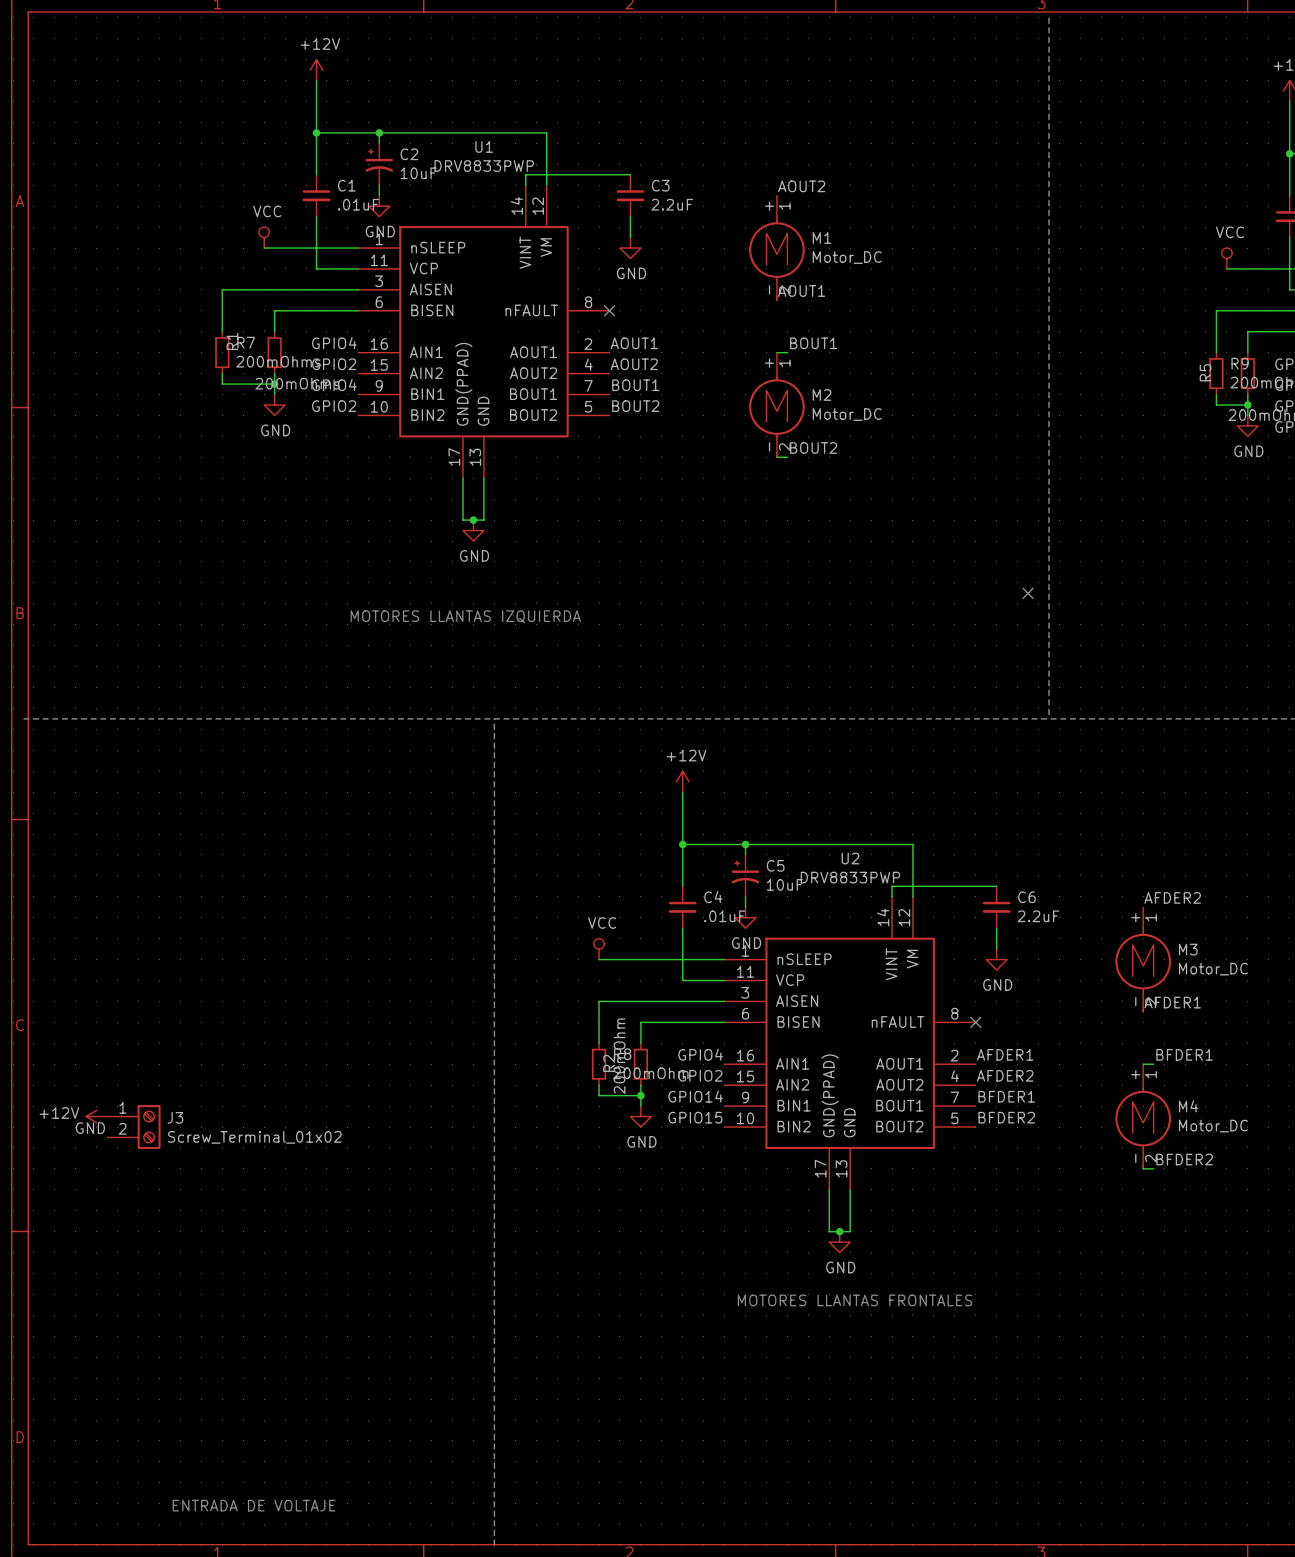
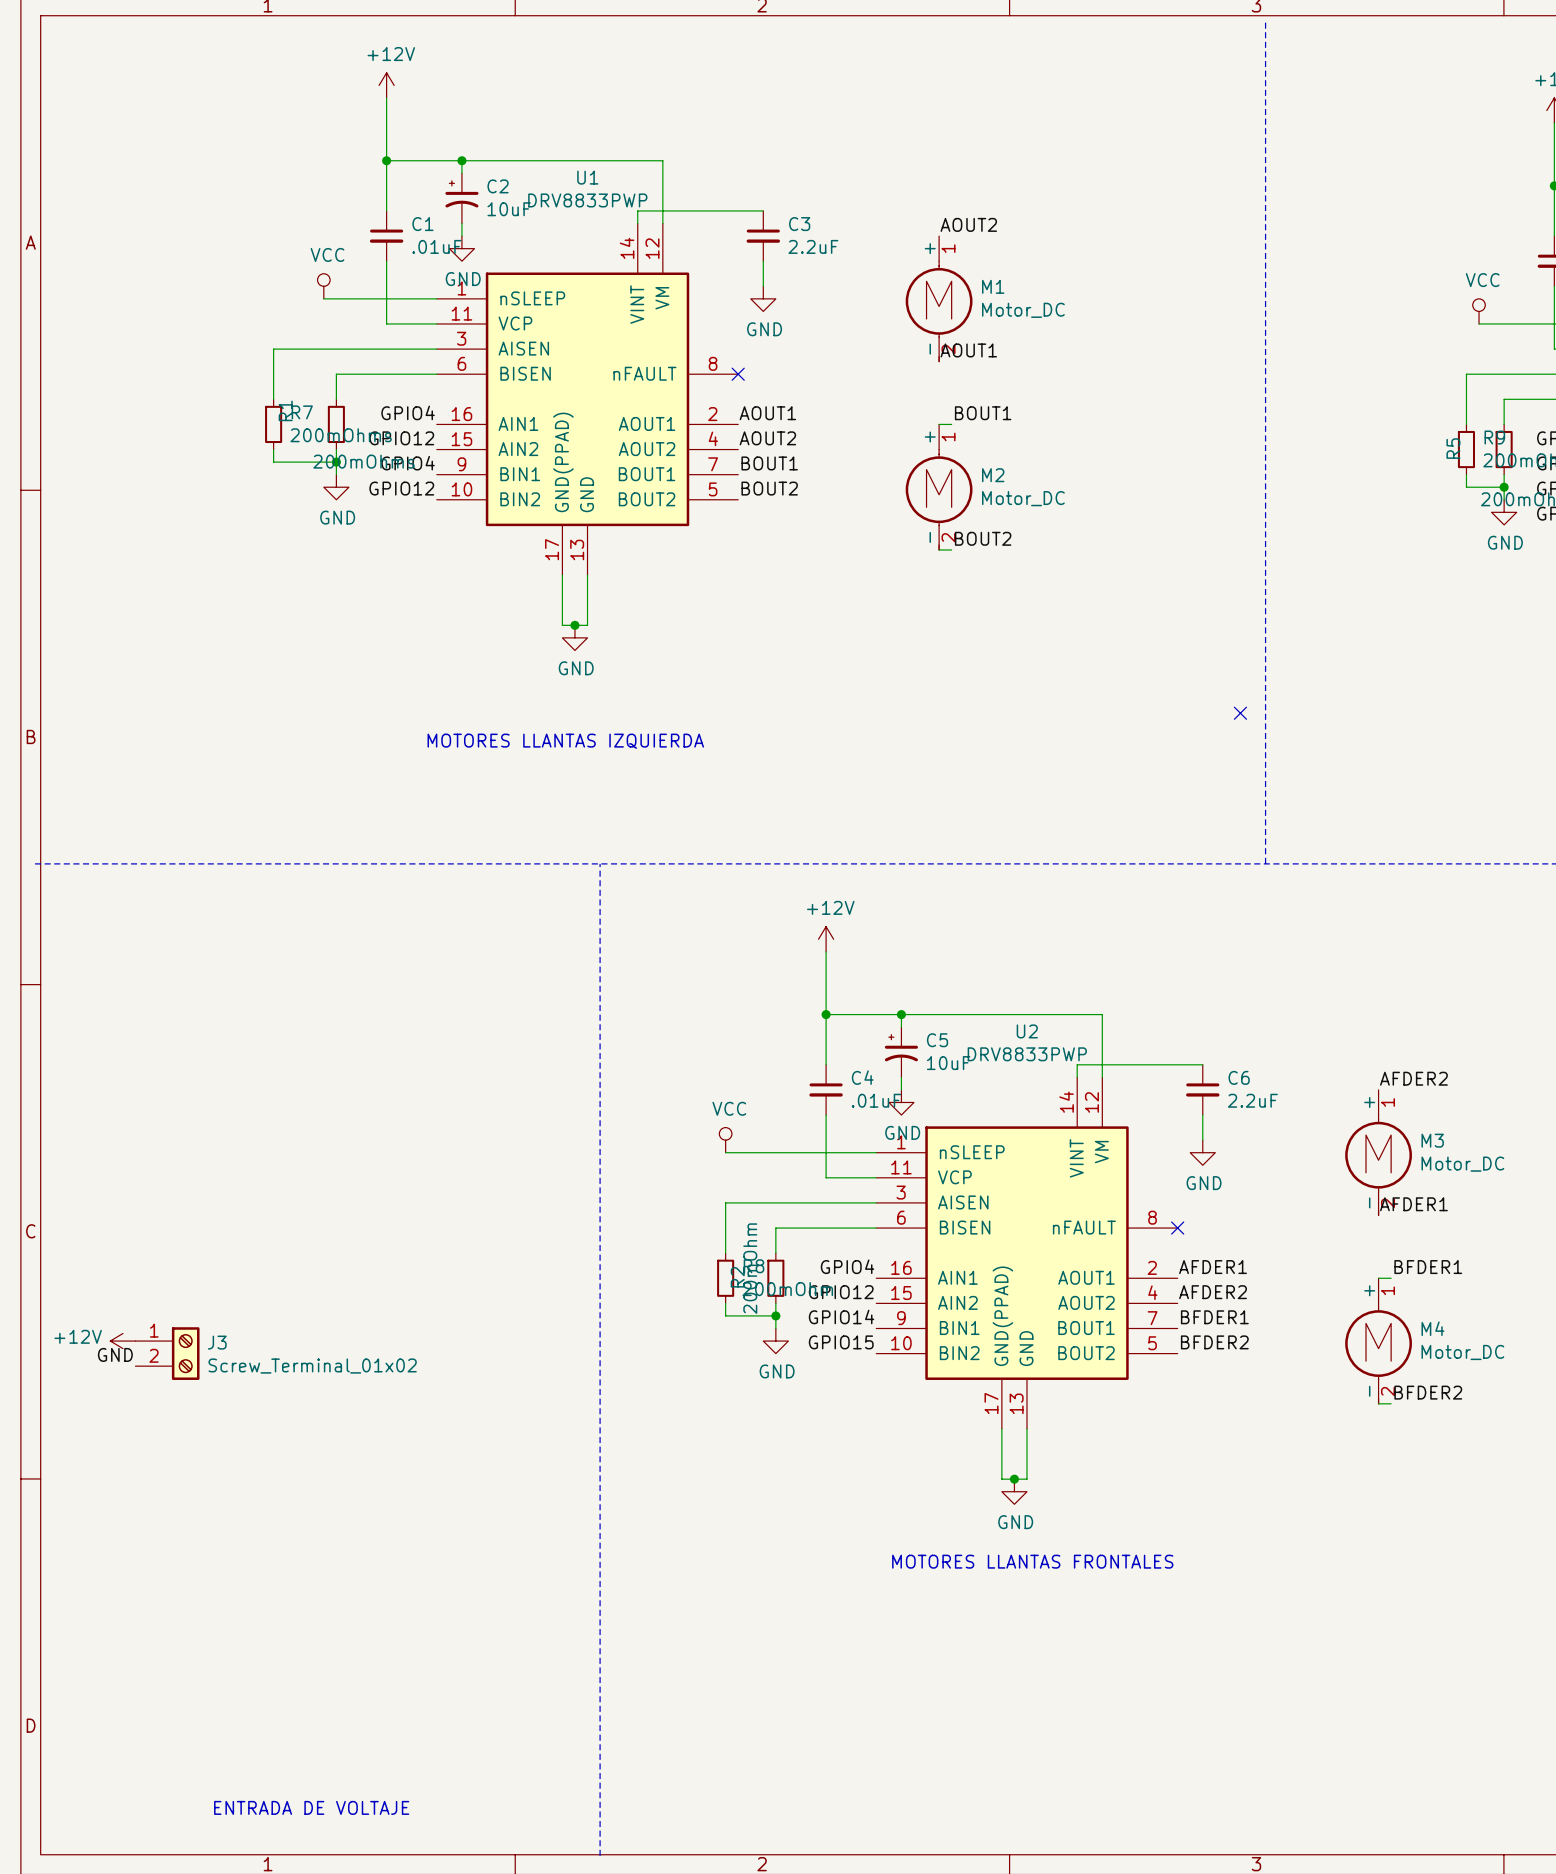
label: GPIO2 (334, 364) -> GPIO12 (401, 438)
label: GPIO2 (334, 406) -> GPIO12 (401, 488)
label: GPIO2 (700, 1075) -> GPIO12 (841, 1292)

